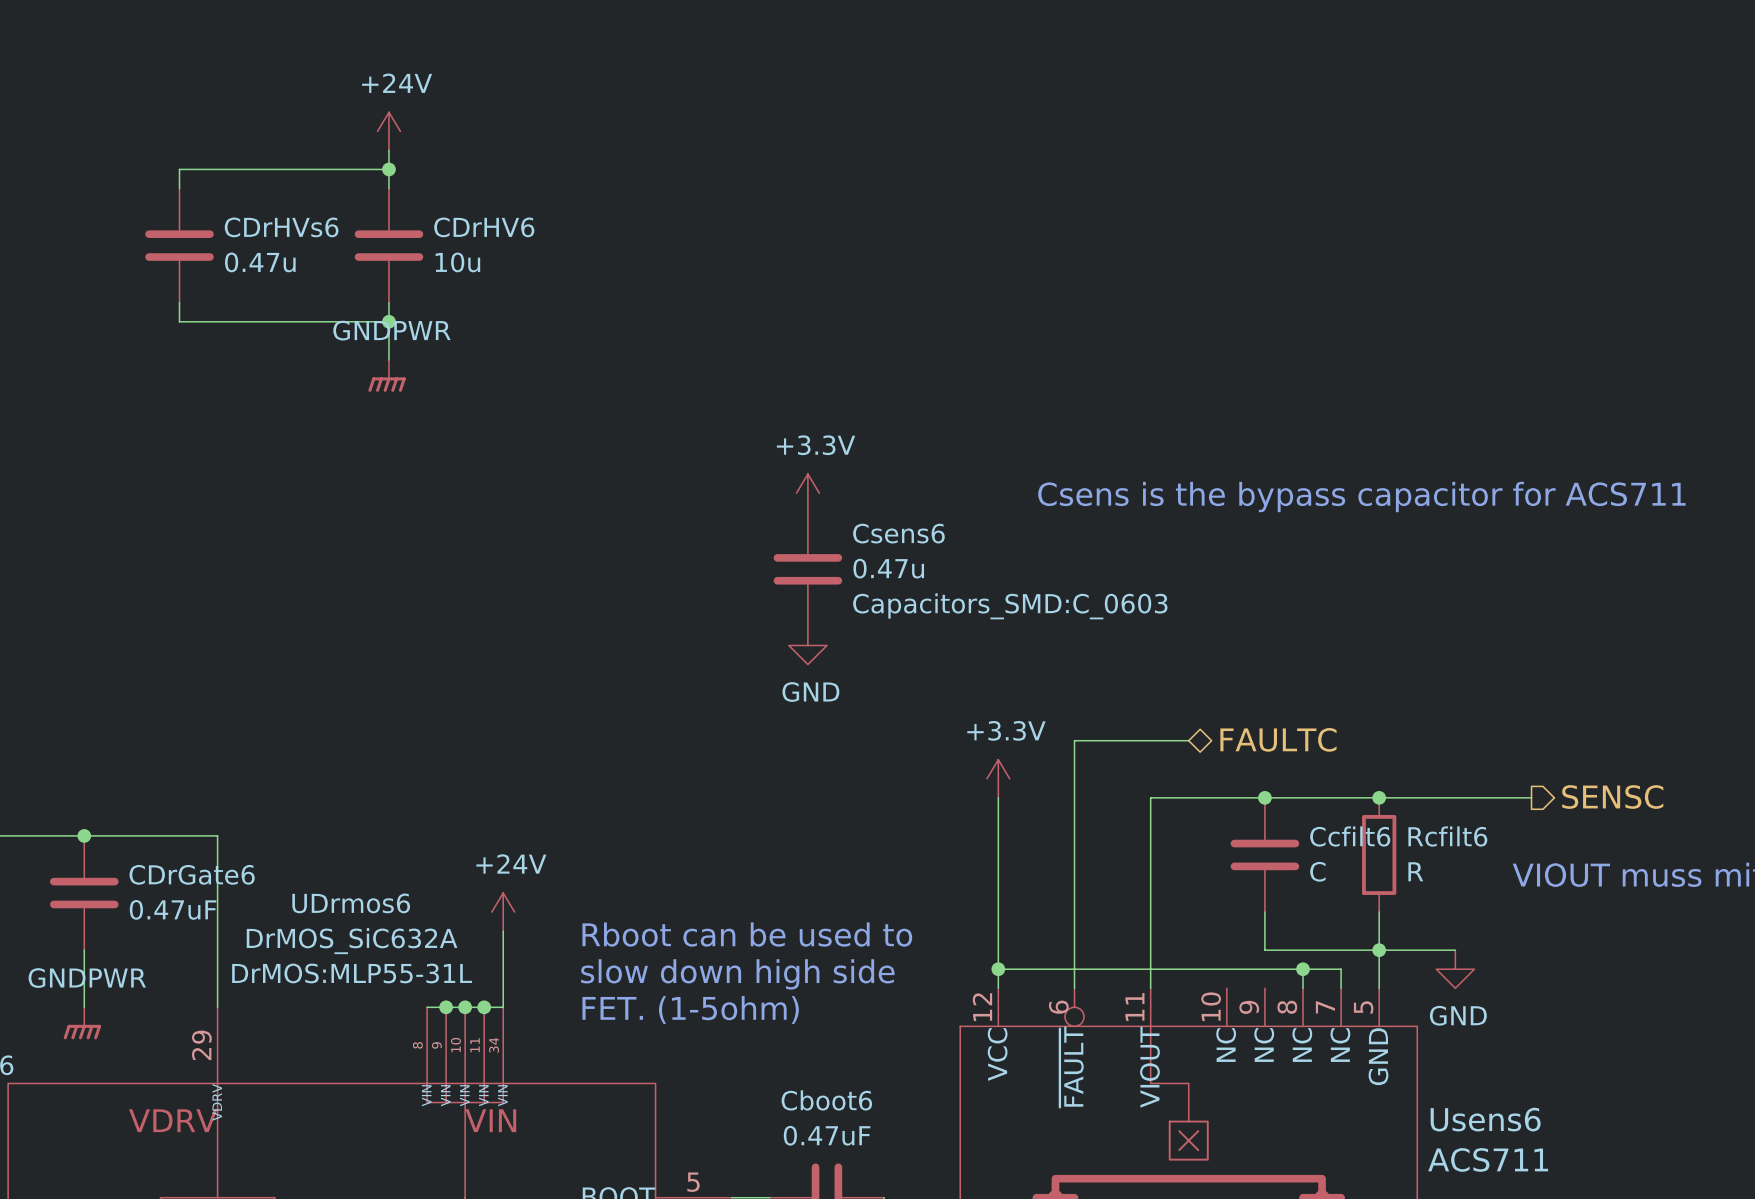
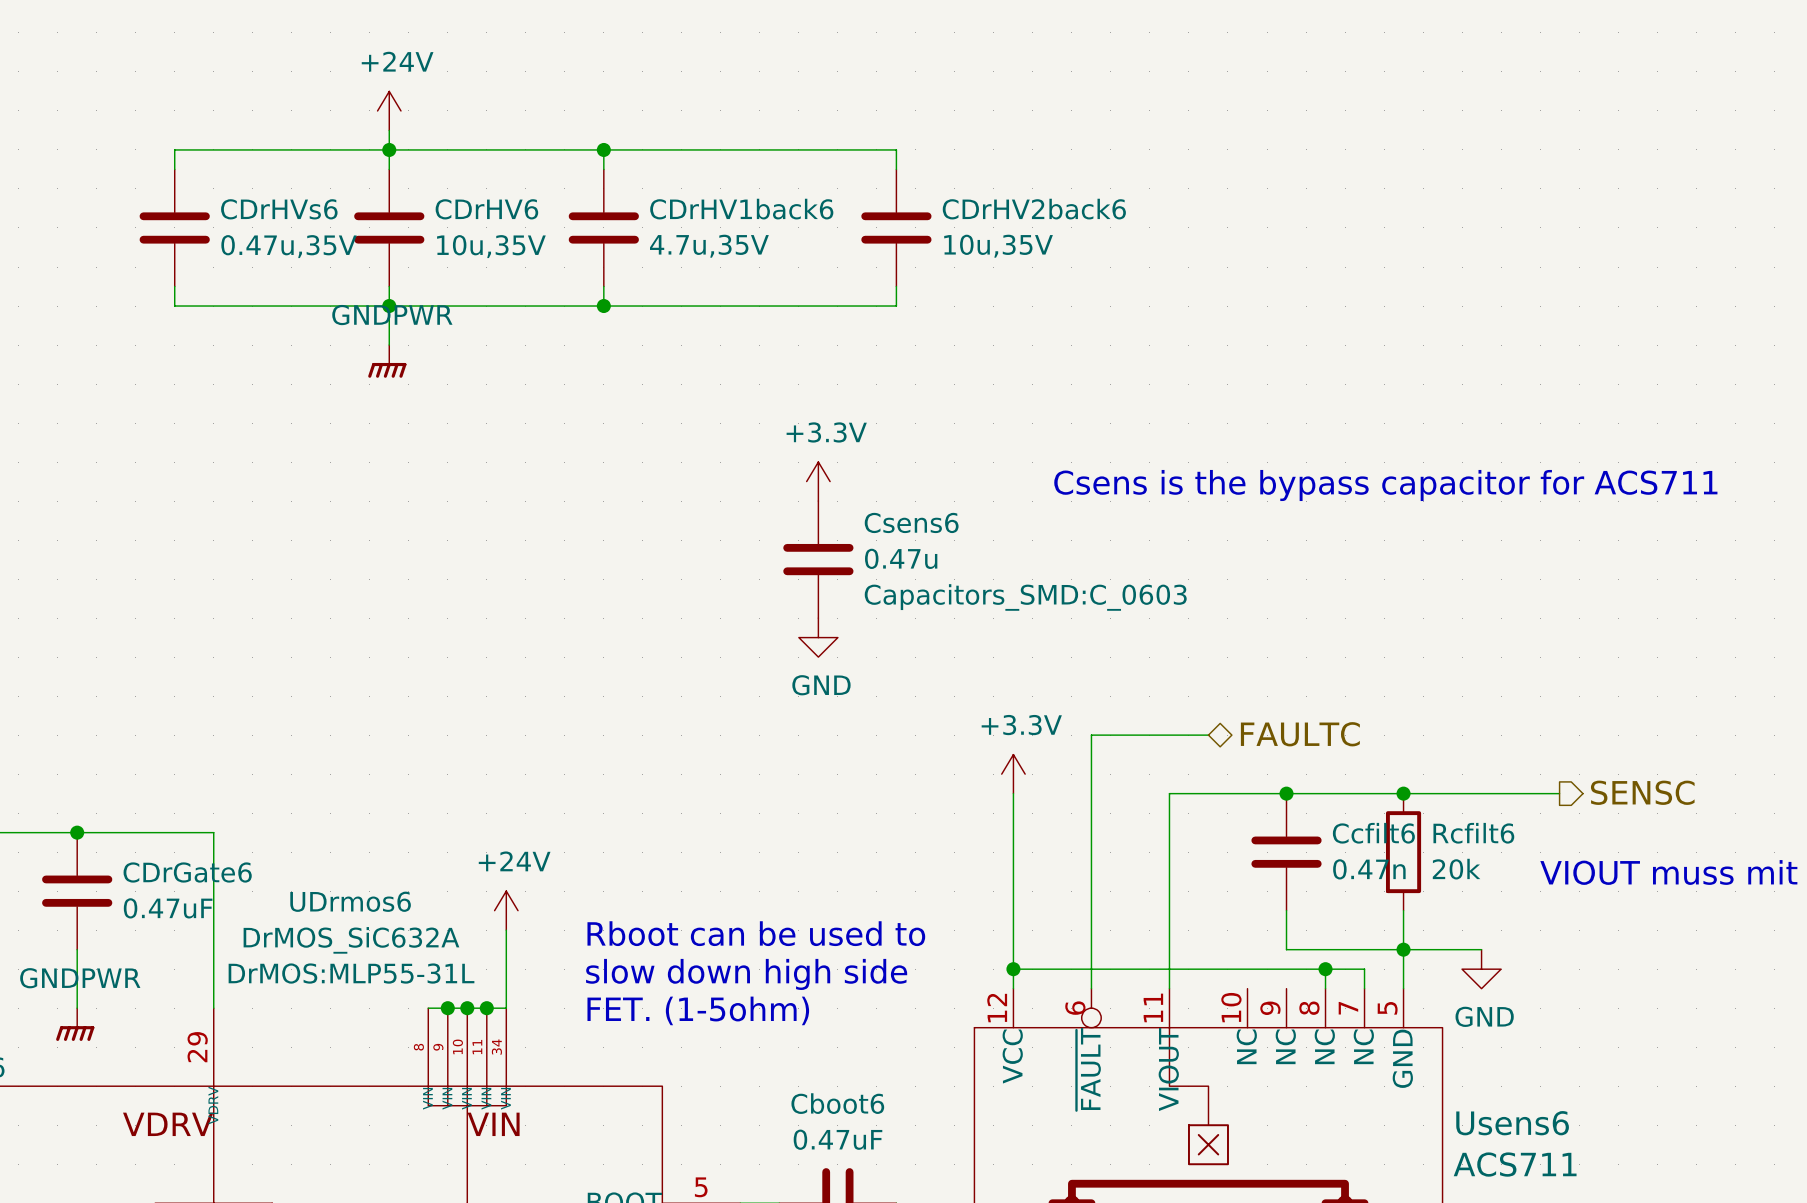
wire: none -> (389, 149) (896, 149) (896, 169)
wire: none -> (603, 149) (603, 169)
junction: none -> (603, 149)
CDrHV1back6: none -> 4.7u,35V (603, 227)
CDrHV2back6: none -> 10u,35V (896, 227)
CDrHVs6 value: 0.47u (260, 262) -> 0.47u,35V (289, 246)
CDrHV6 value: 10u (457, 262) -> 10u,35V (491, 246)
wire: none -> (603, 286) (603, 306)
wire: none -> (896, 286) (896, 306) (389, 306)
junction: none -> (603, 306)
Ccfilt6 value: C (1317, 871) -> 0.47n (1369, 869)
Rcfilt6 value: R (1415, 871) -> 20k (1456, 869)

